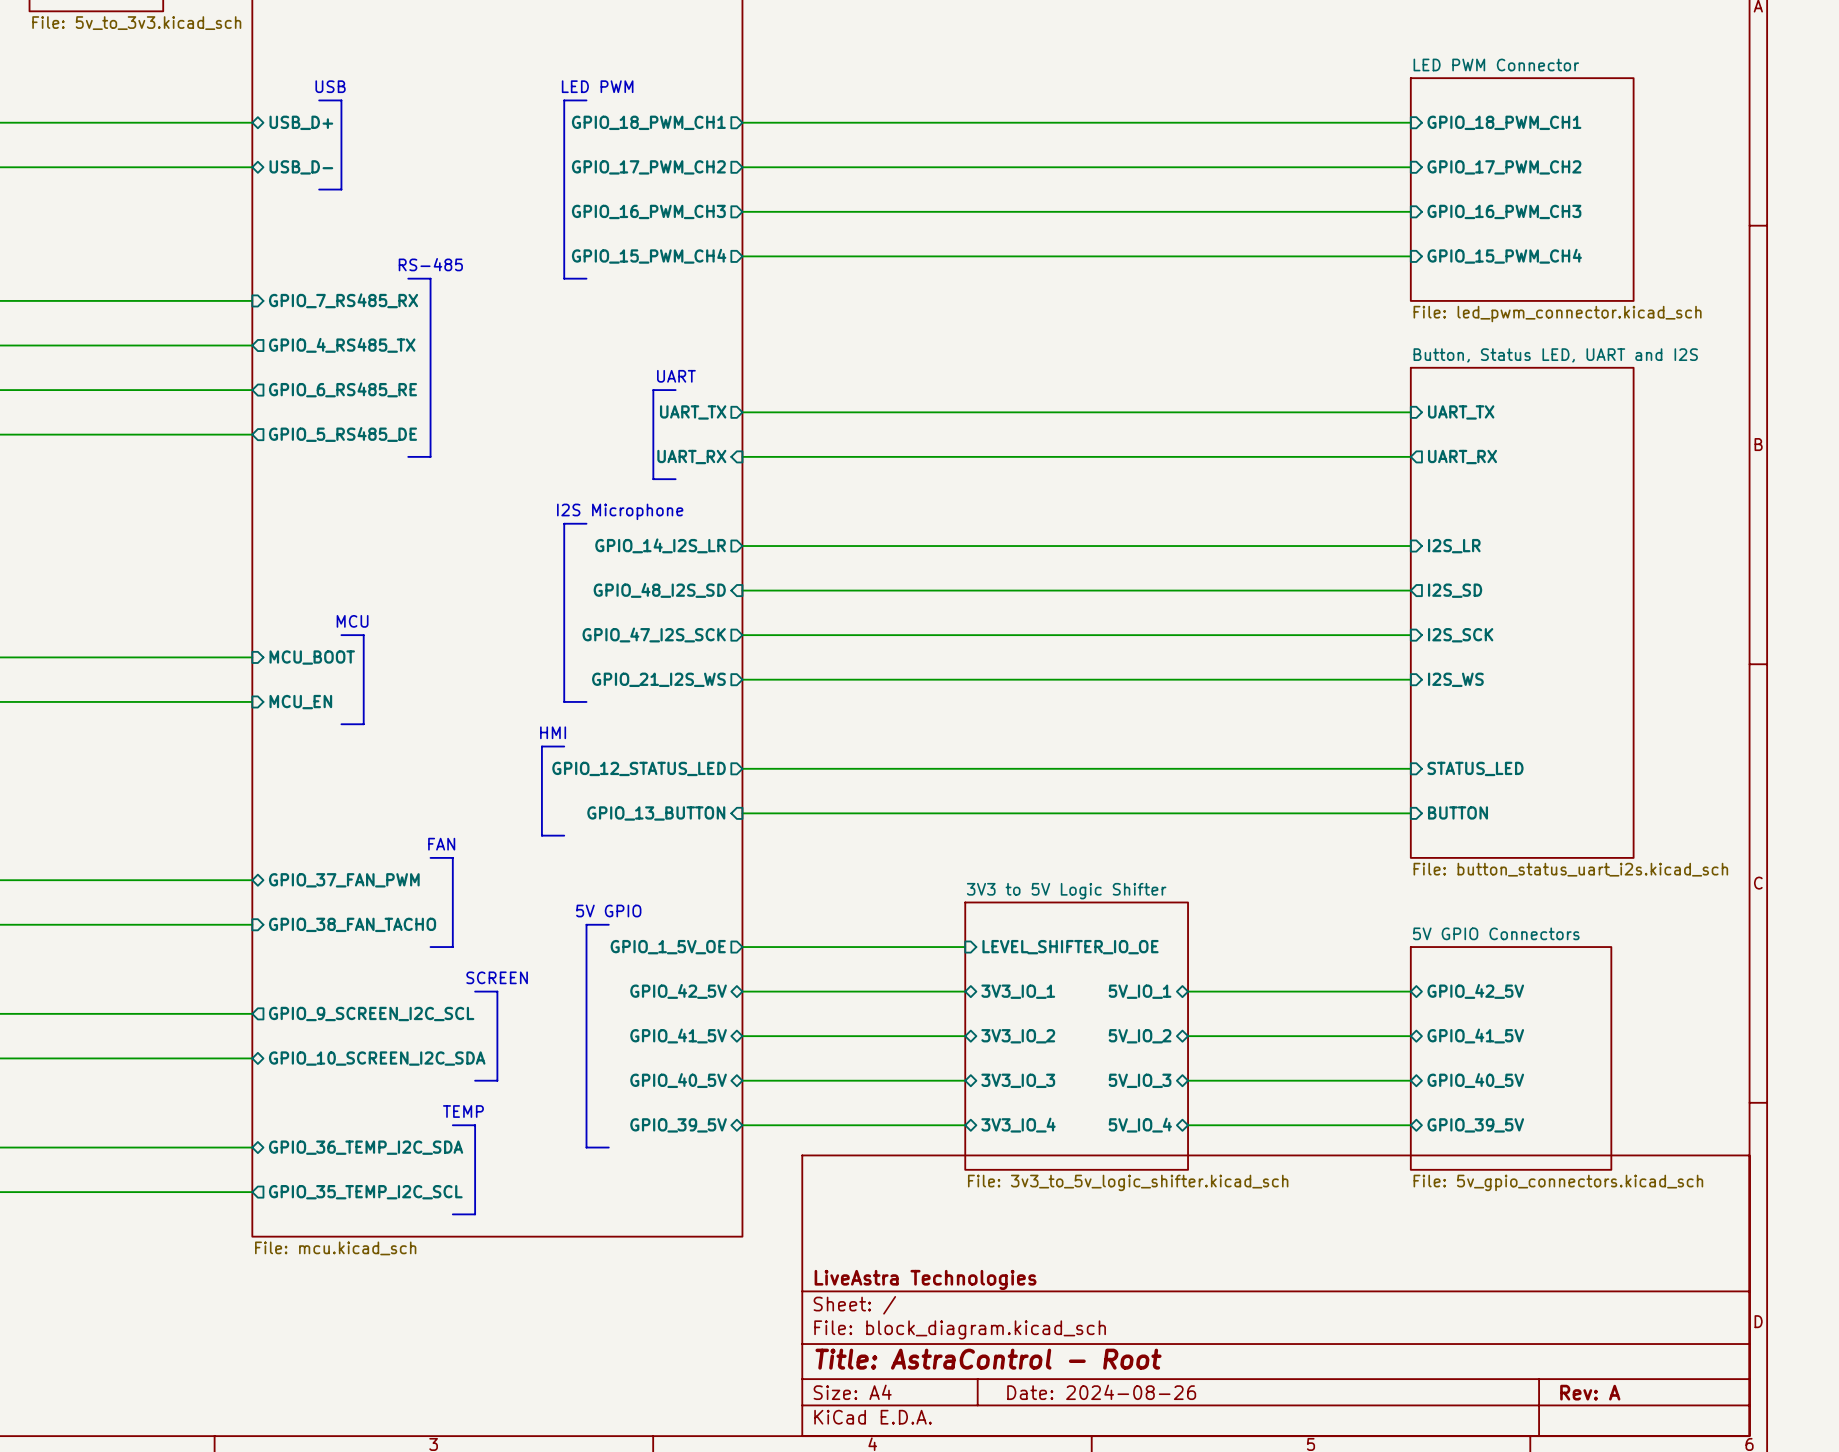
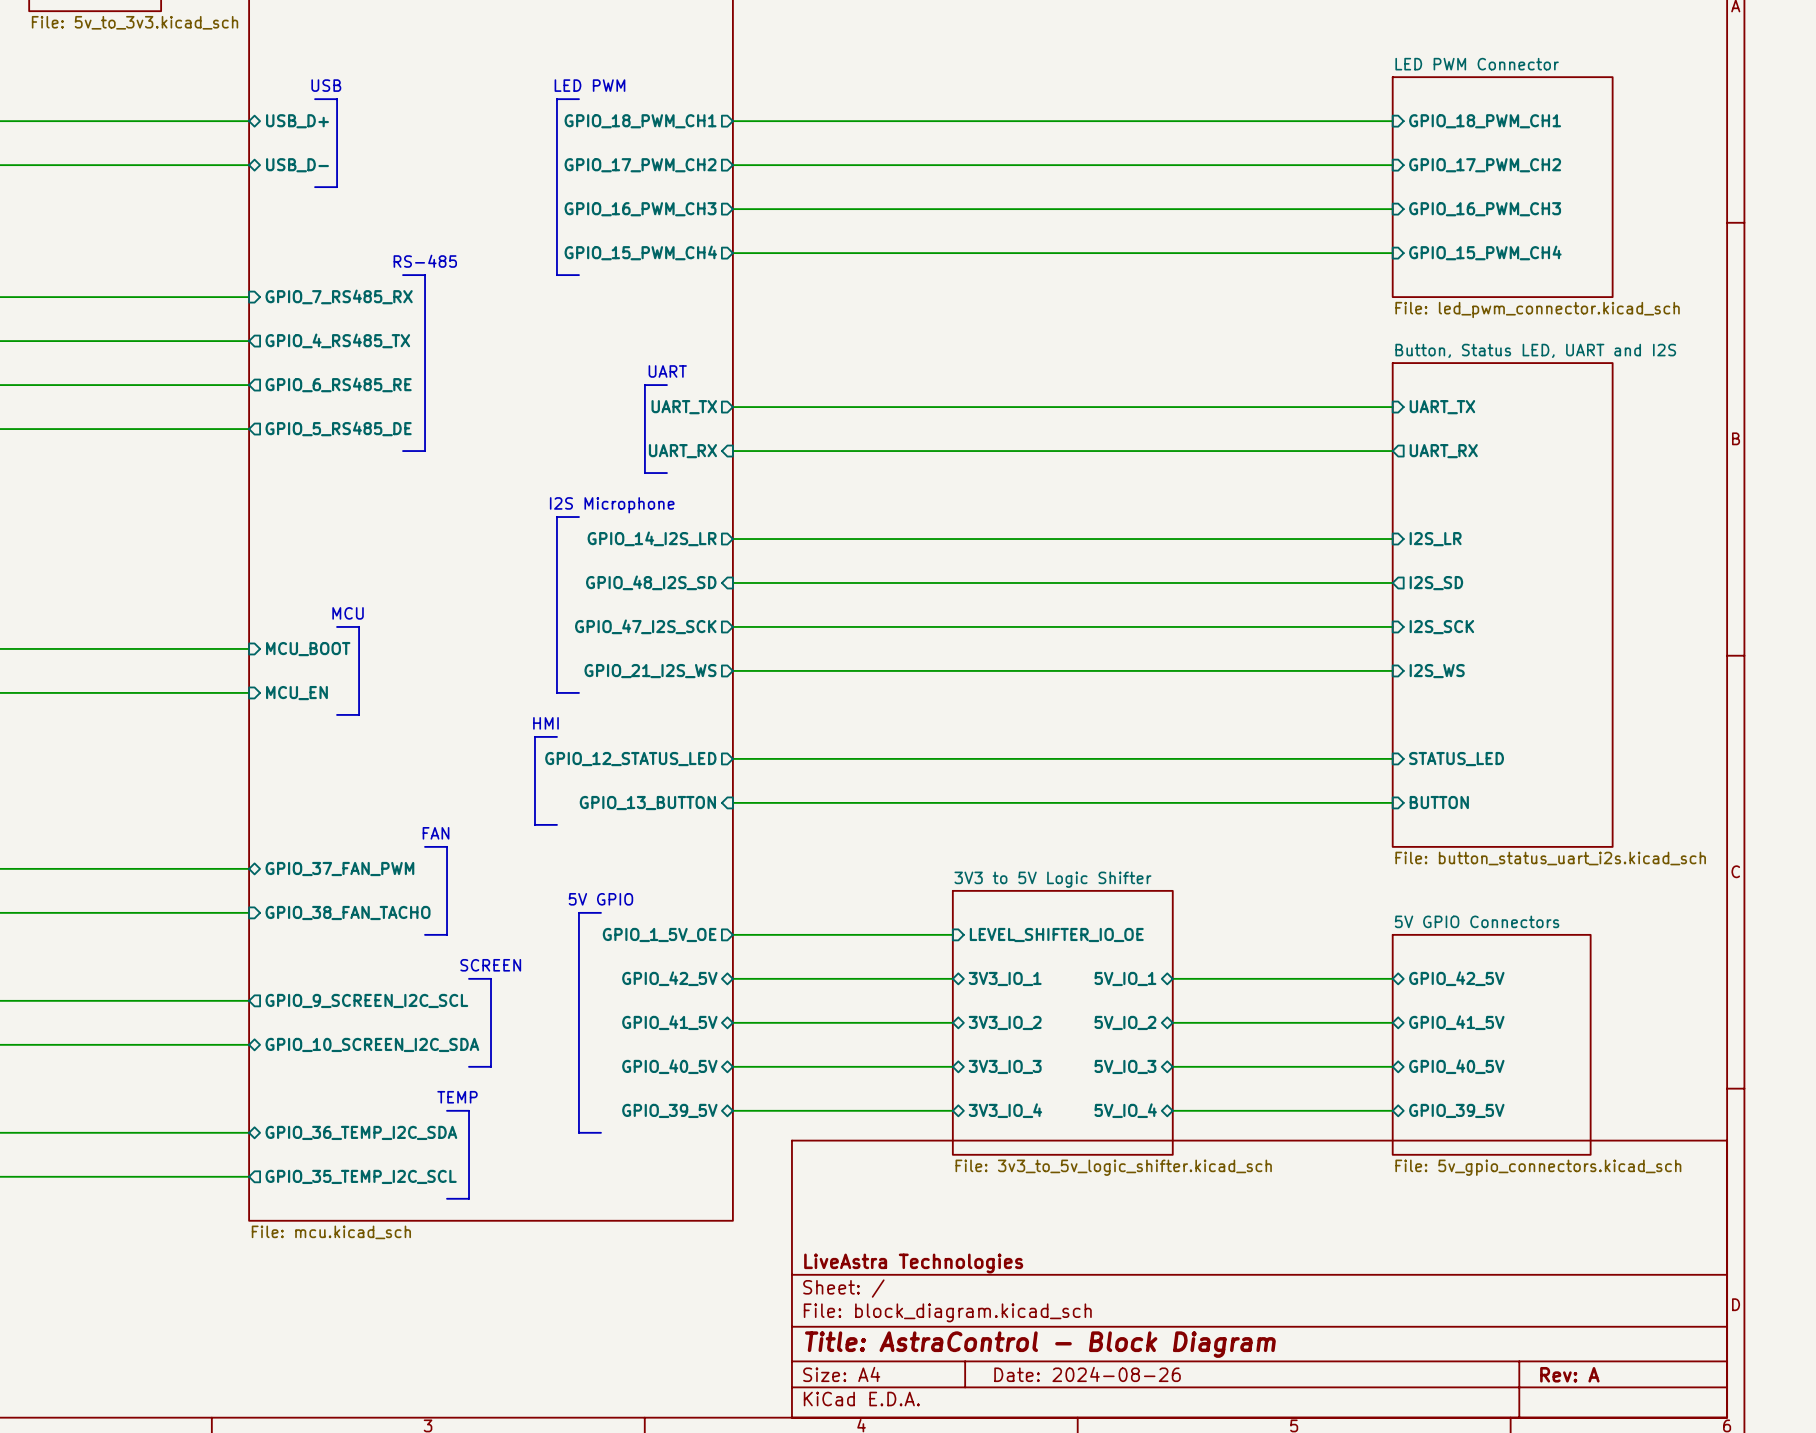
title block: Title: AstraControl - Root (988, 1359) -> Title: AstraControl - Block Diagram (1040, 1344)

